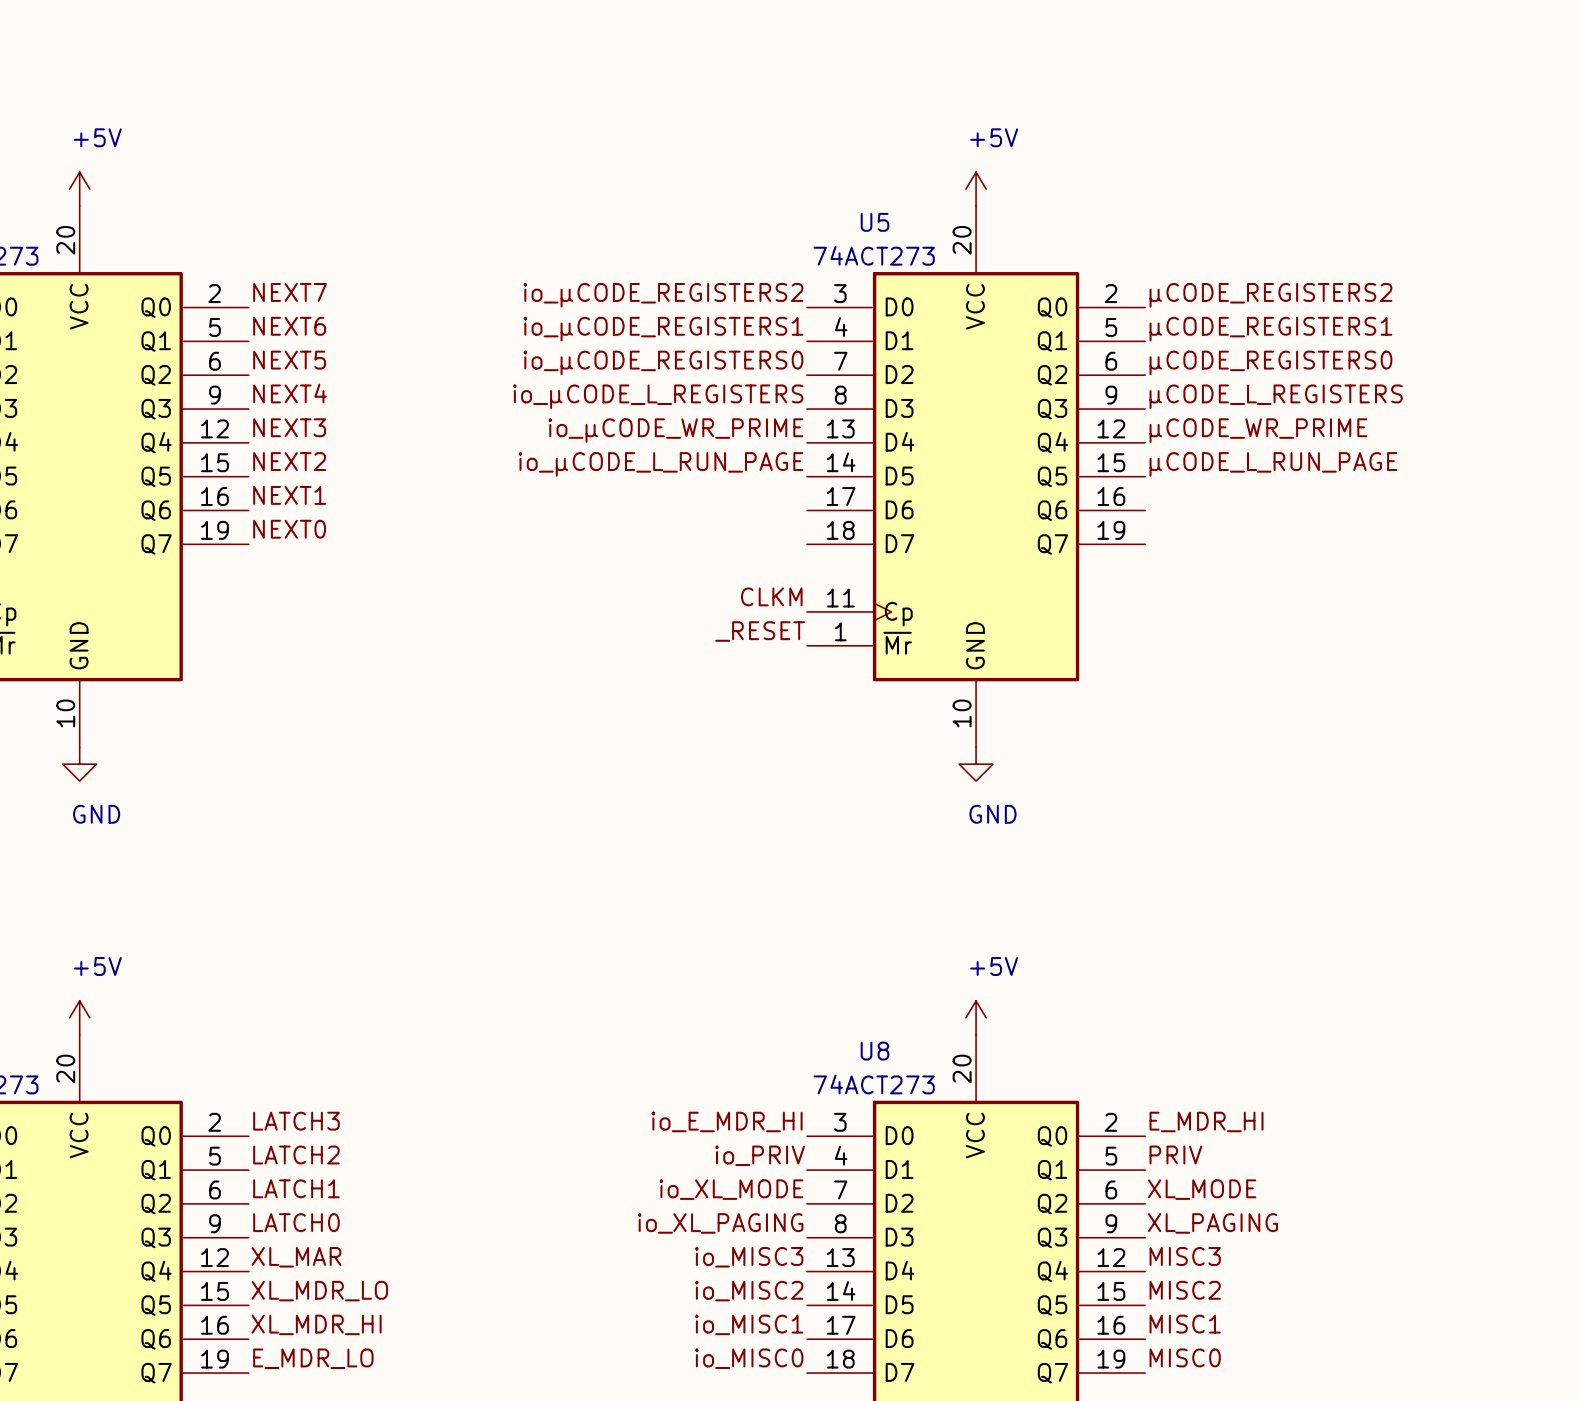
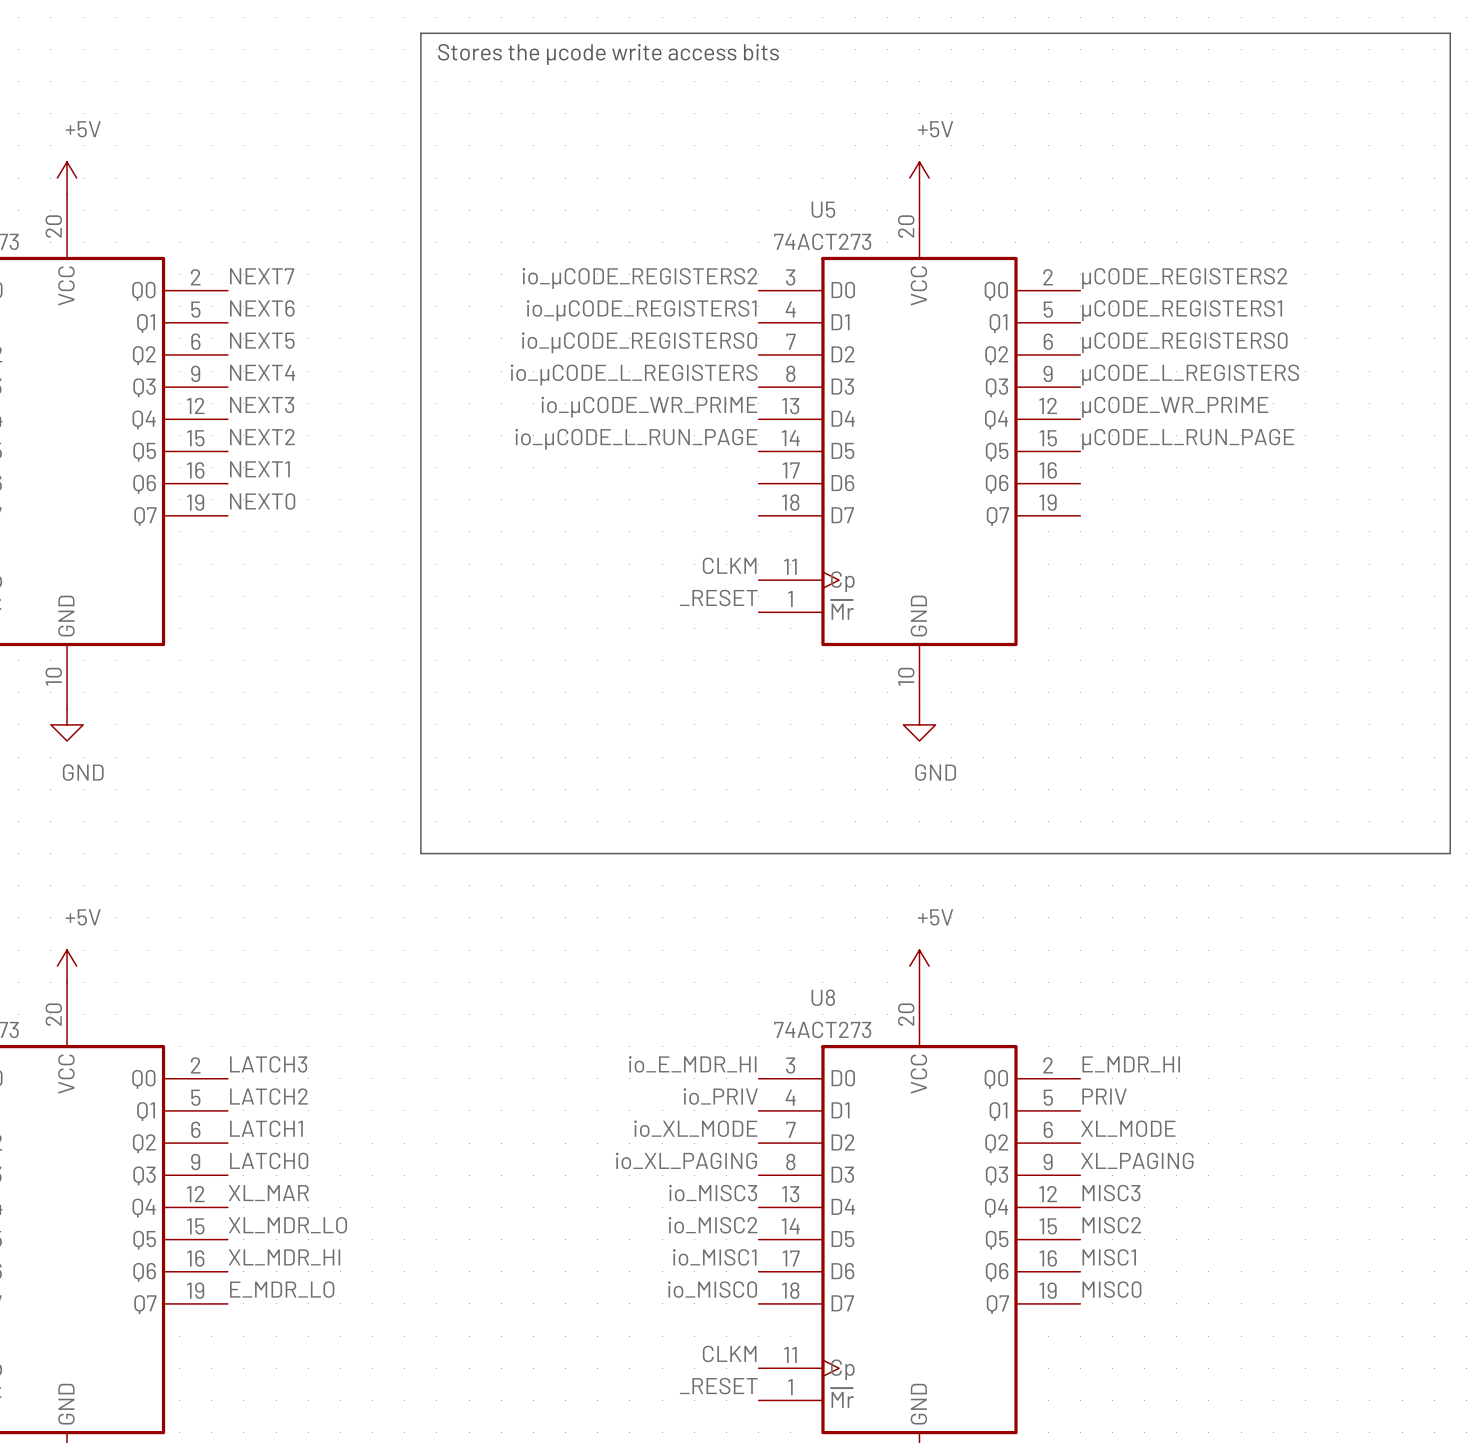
line: none -> (420, 33) (420, 853) (1450, 853) (1450, 33) (420, 33)
text: none -> Stores the µcode write access bits (608, 54)

